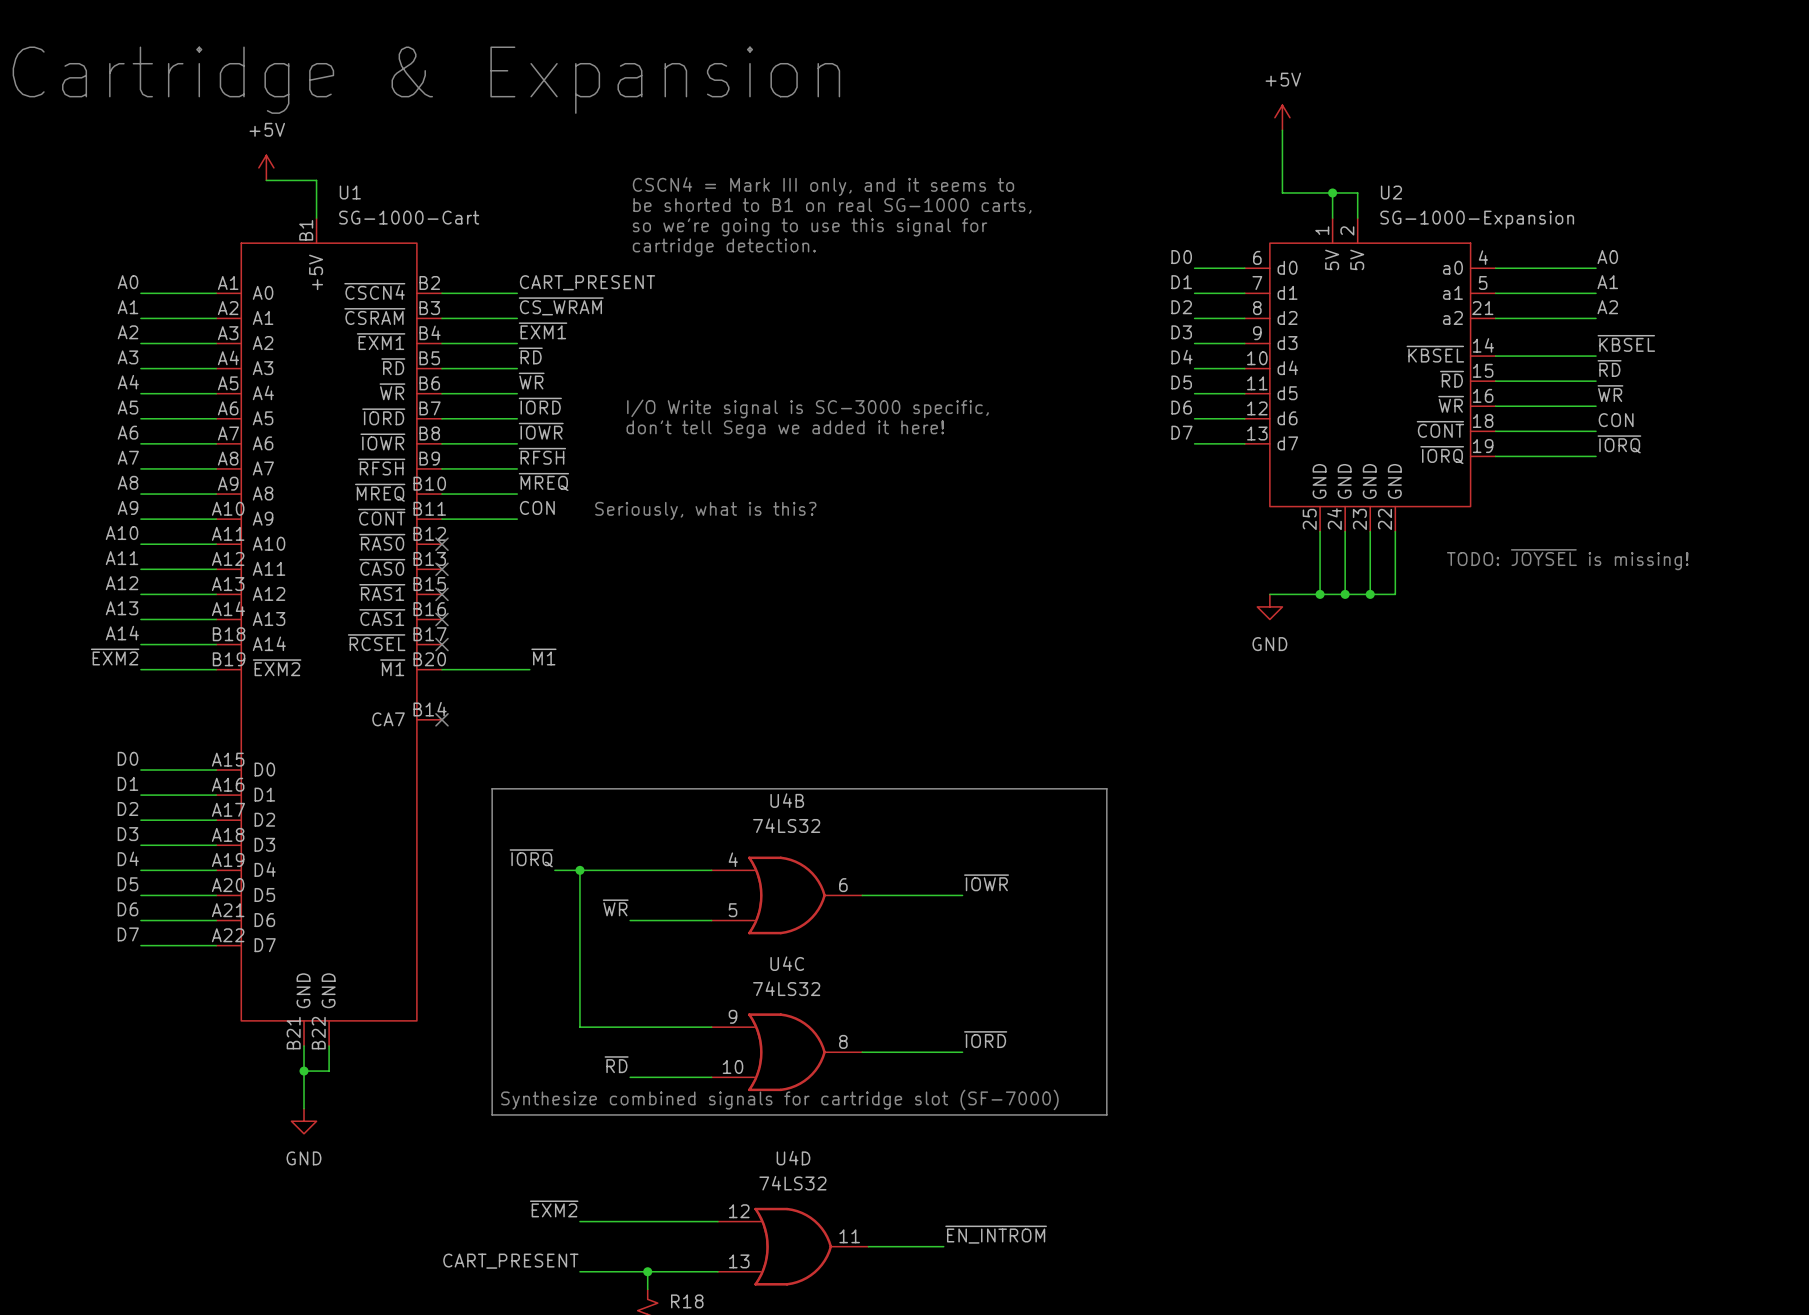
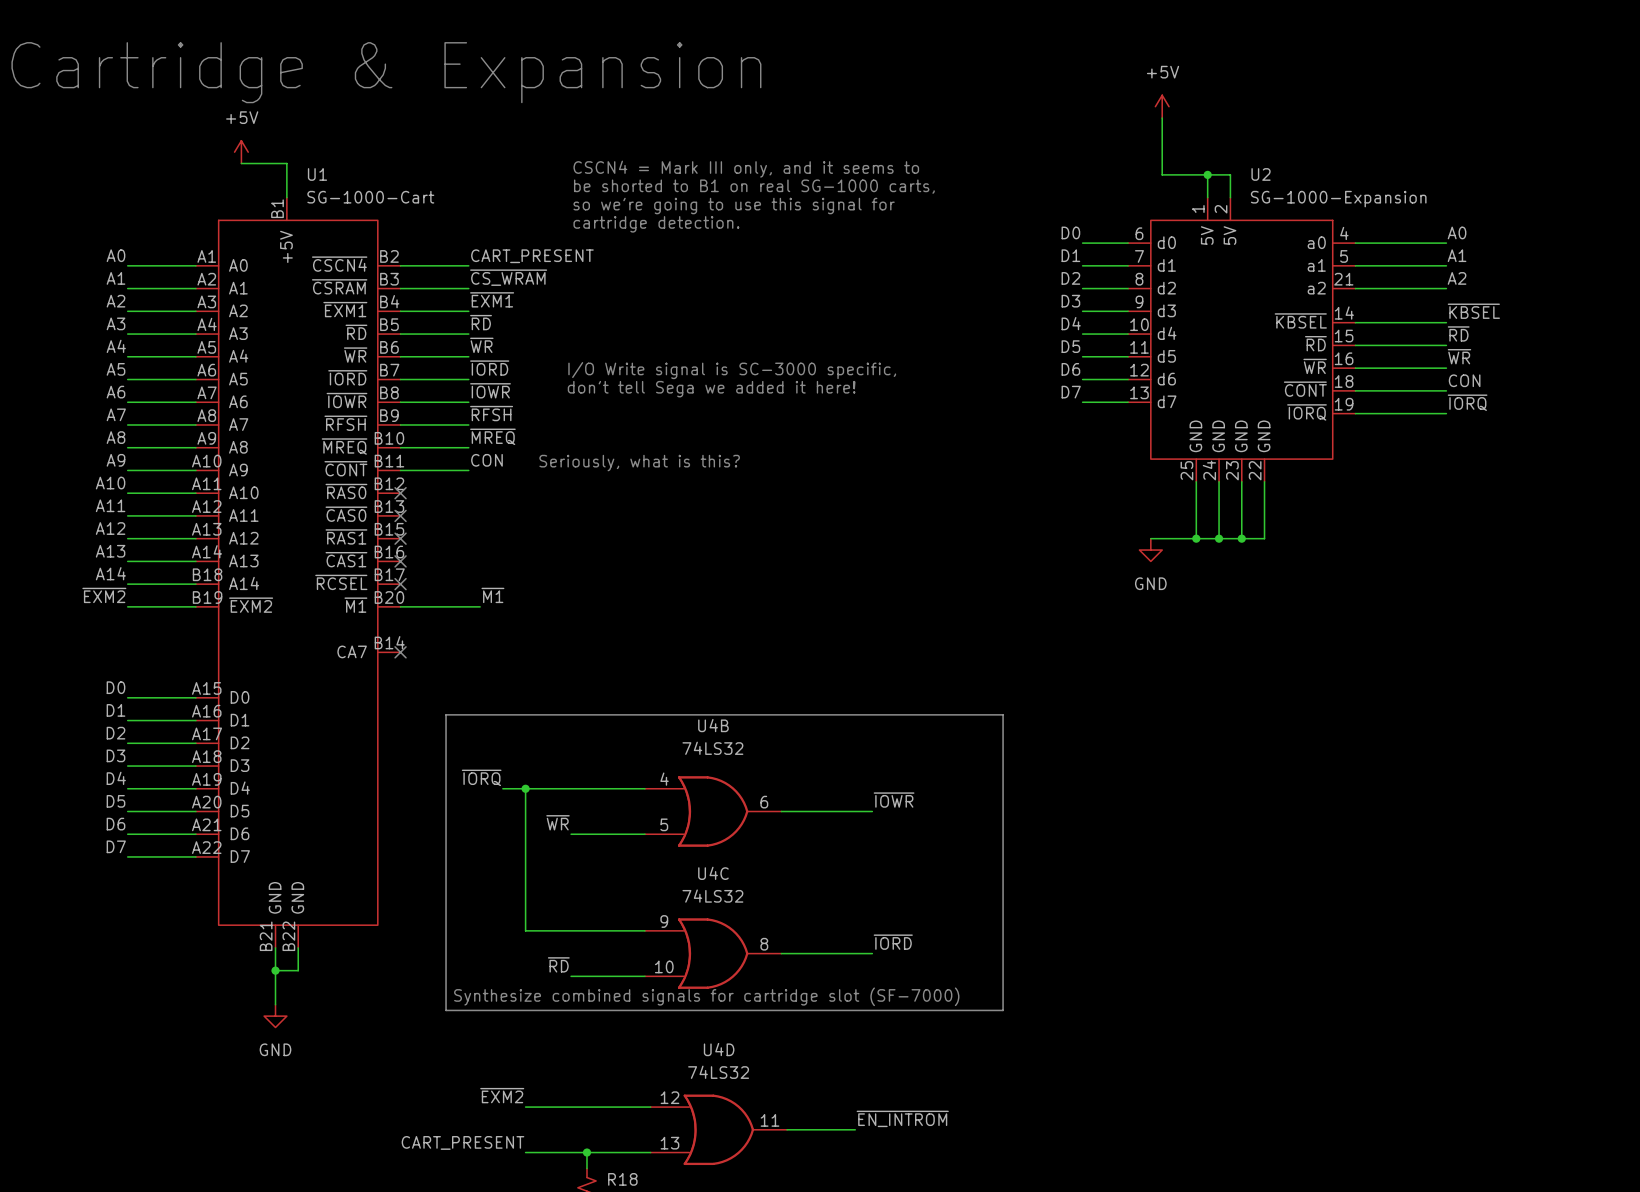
text: TODO: ~{JOYSEL} is missing! (1567, 559) -> none

